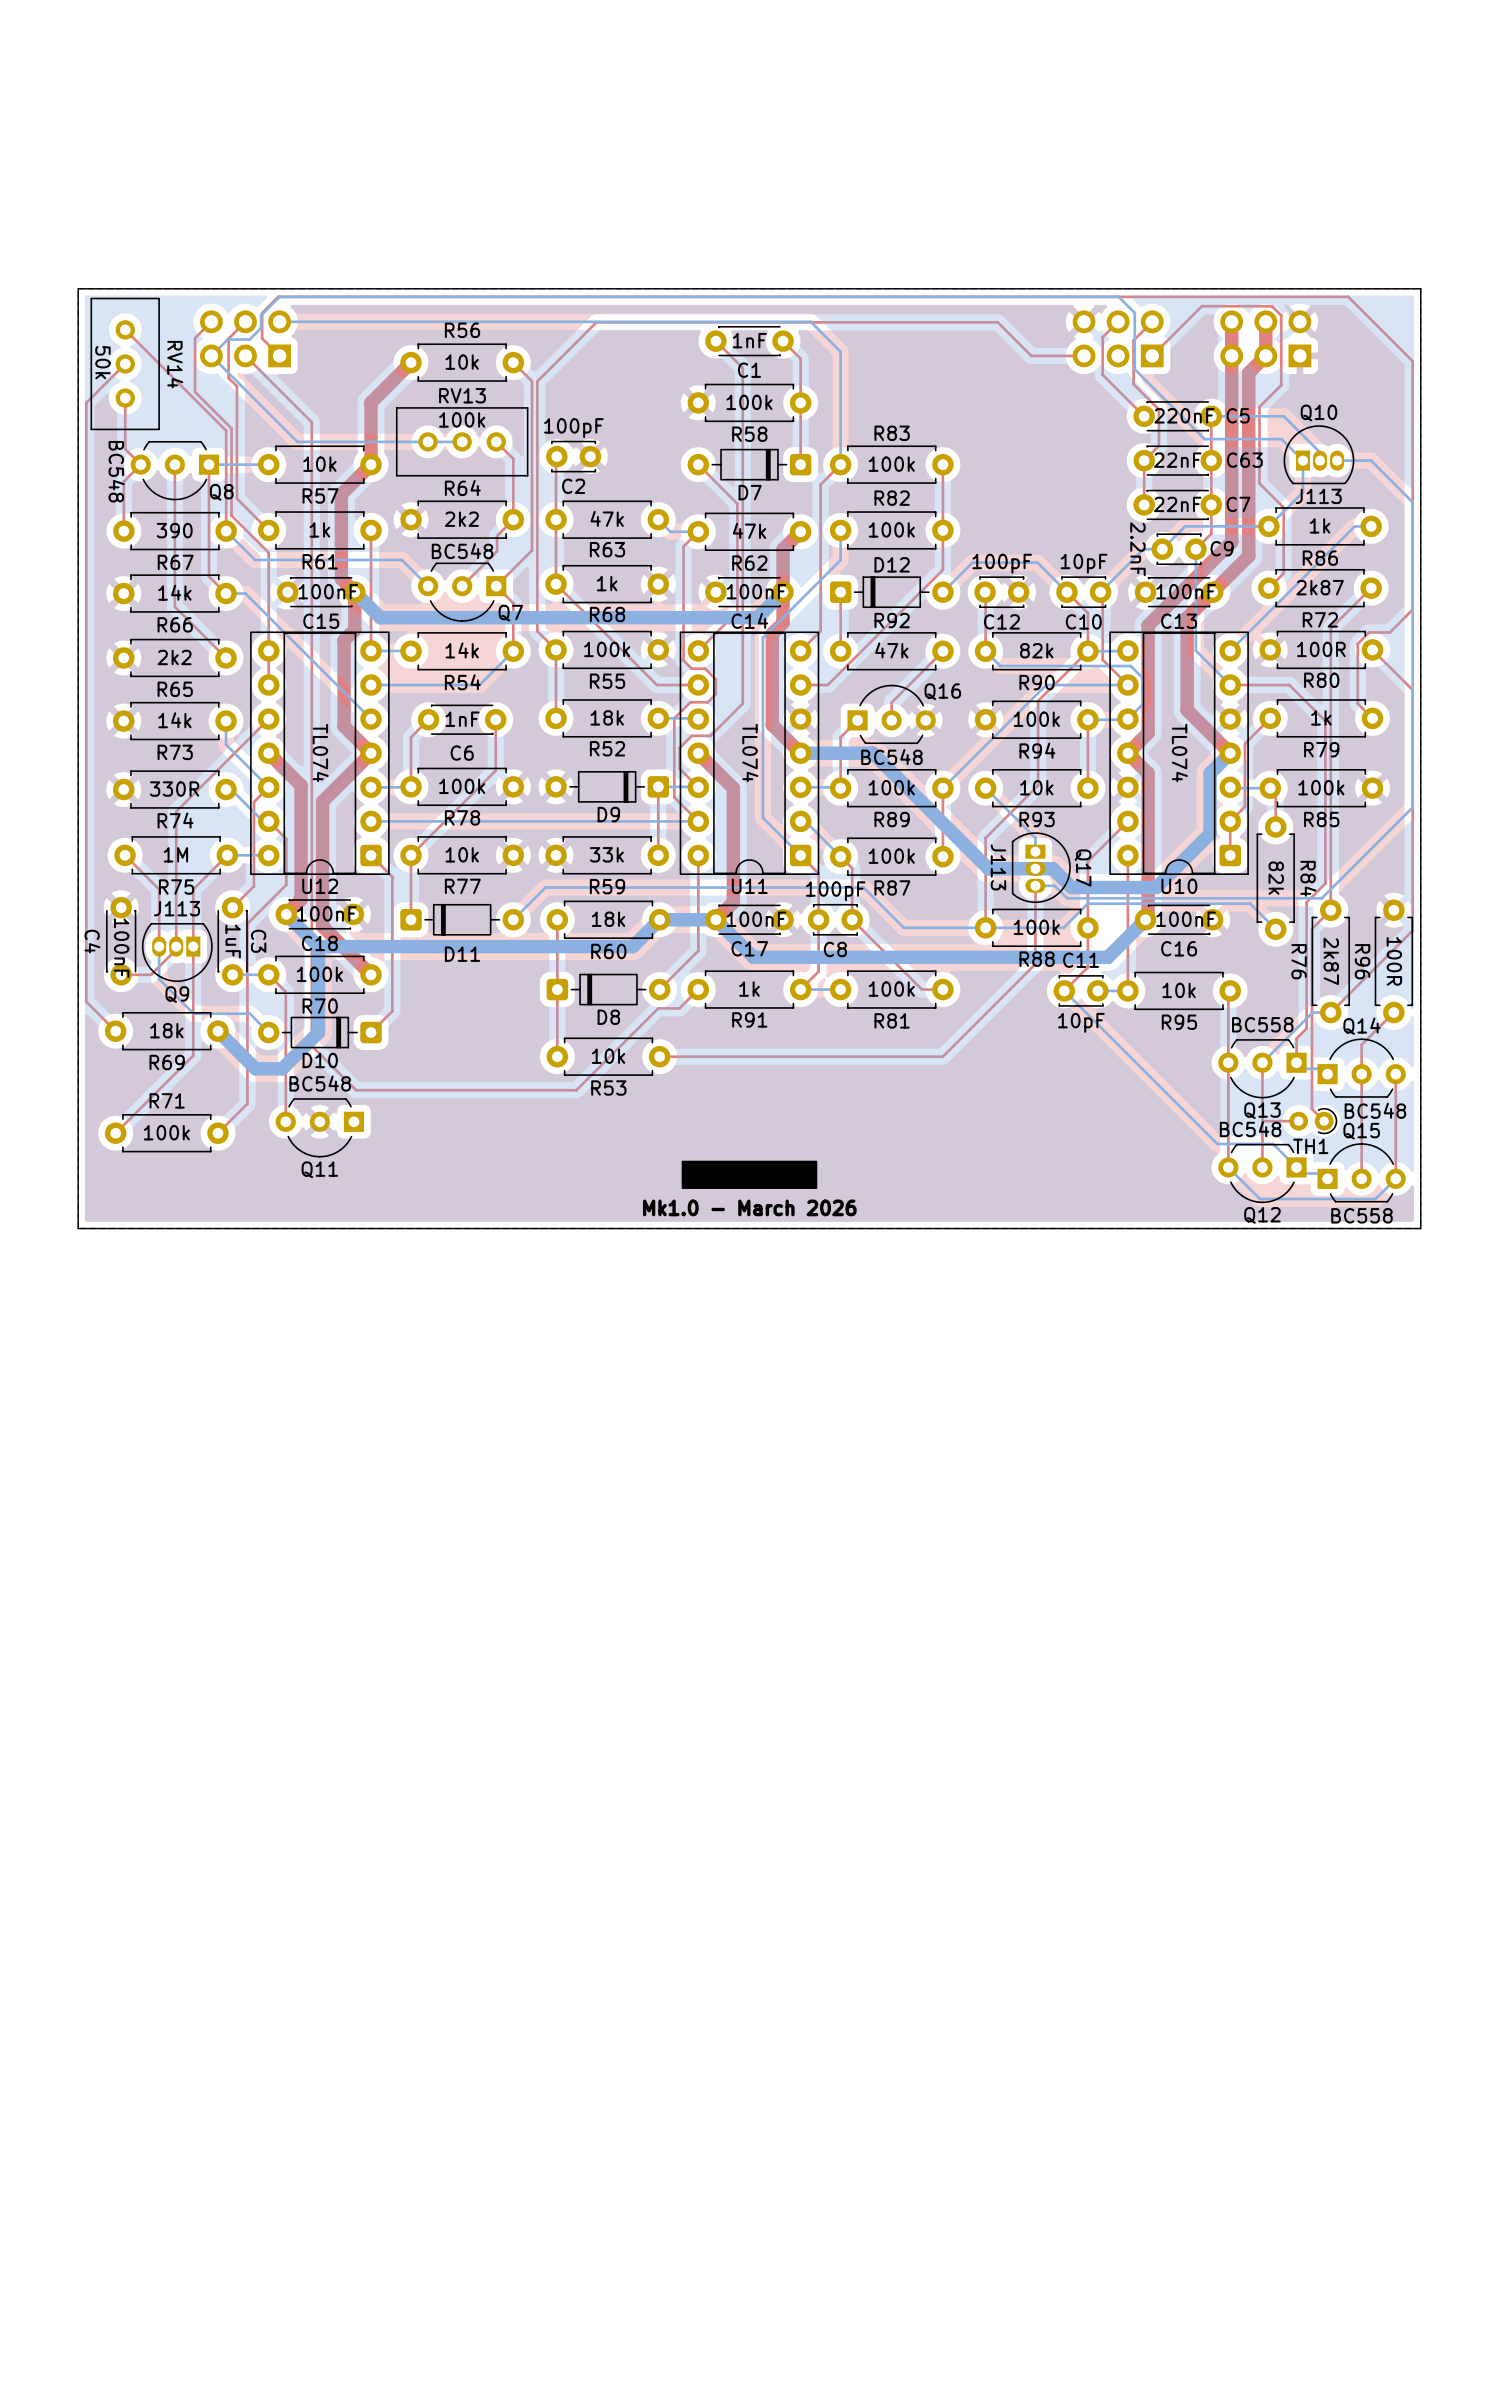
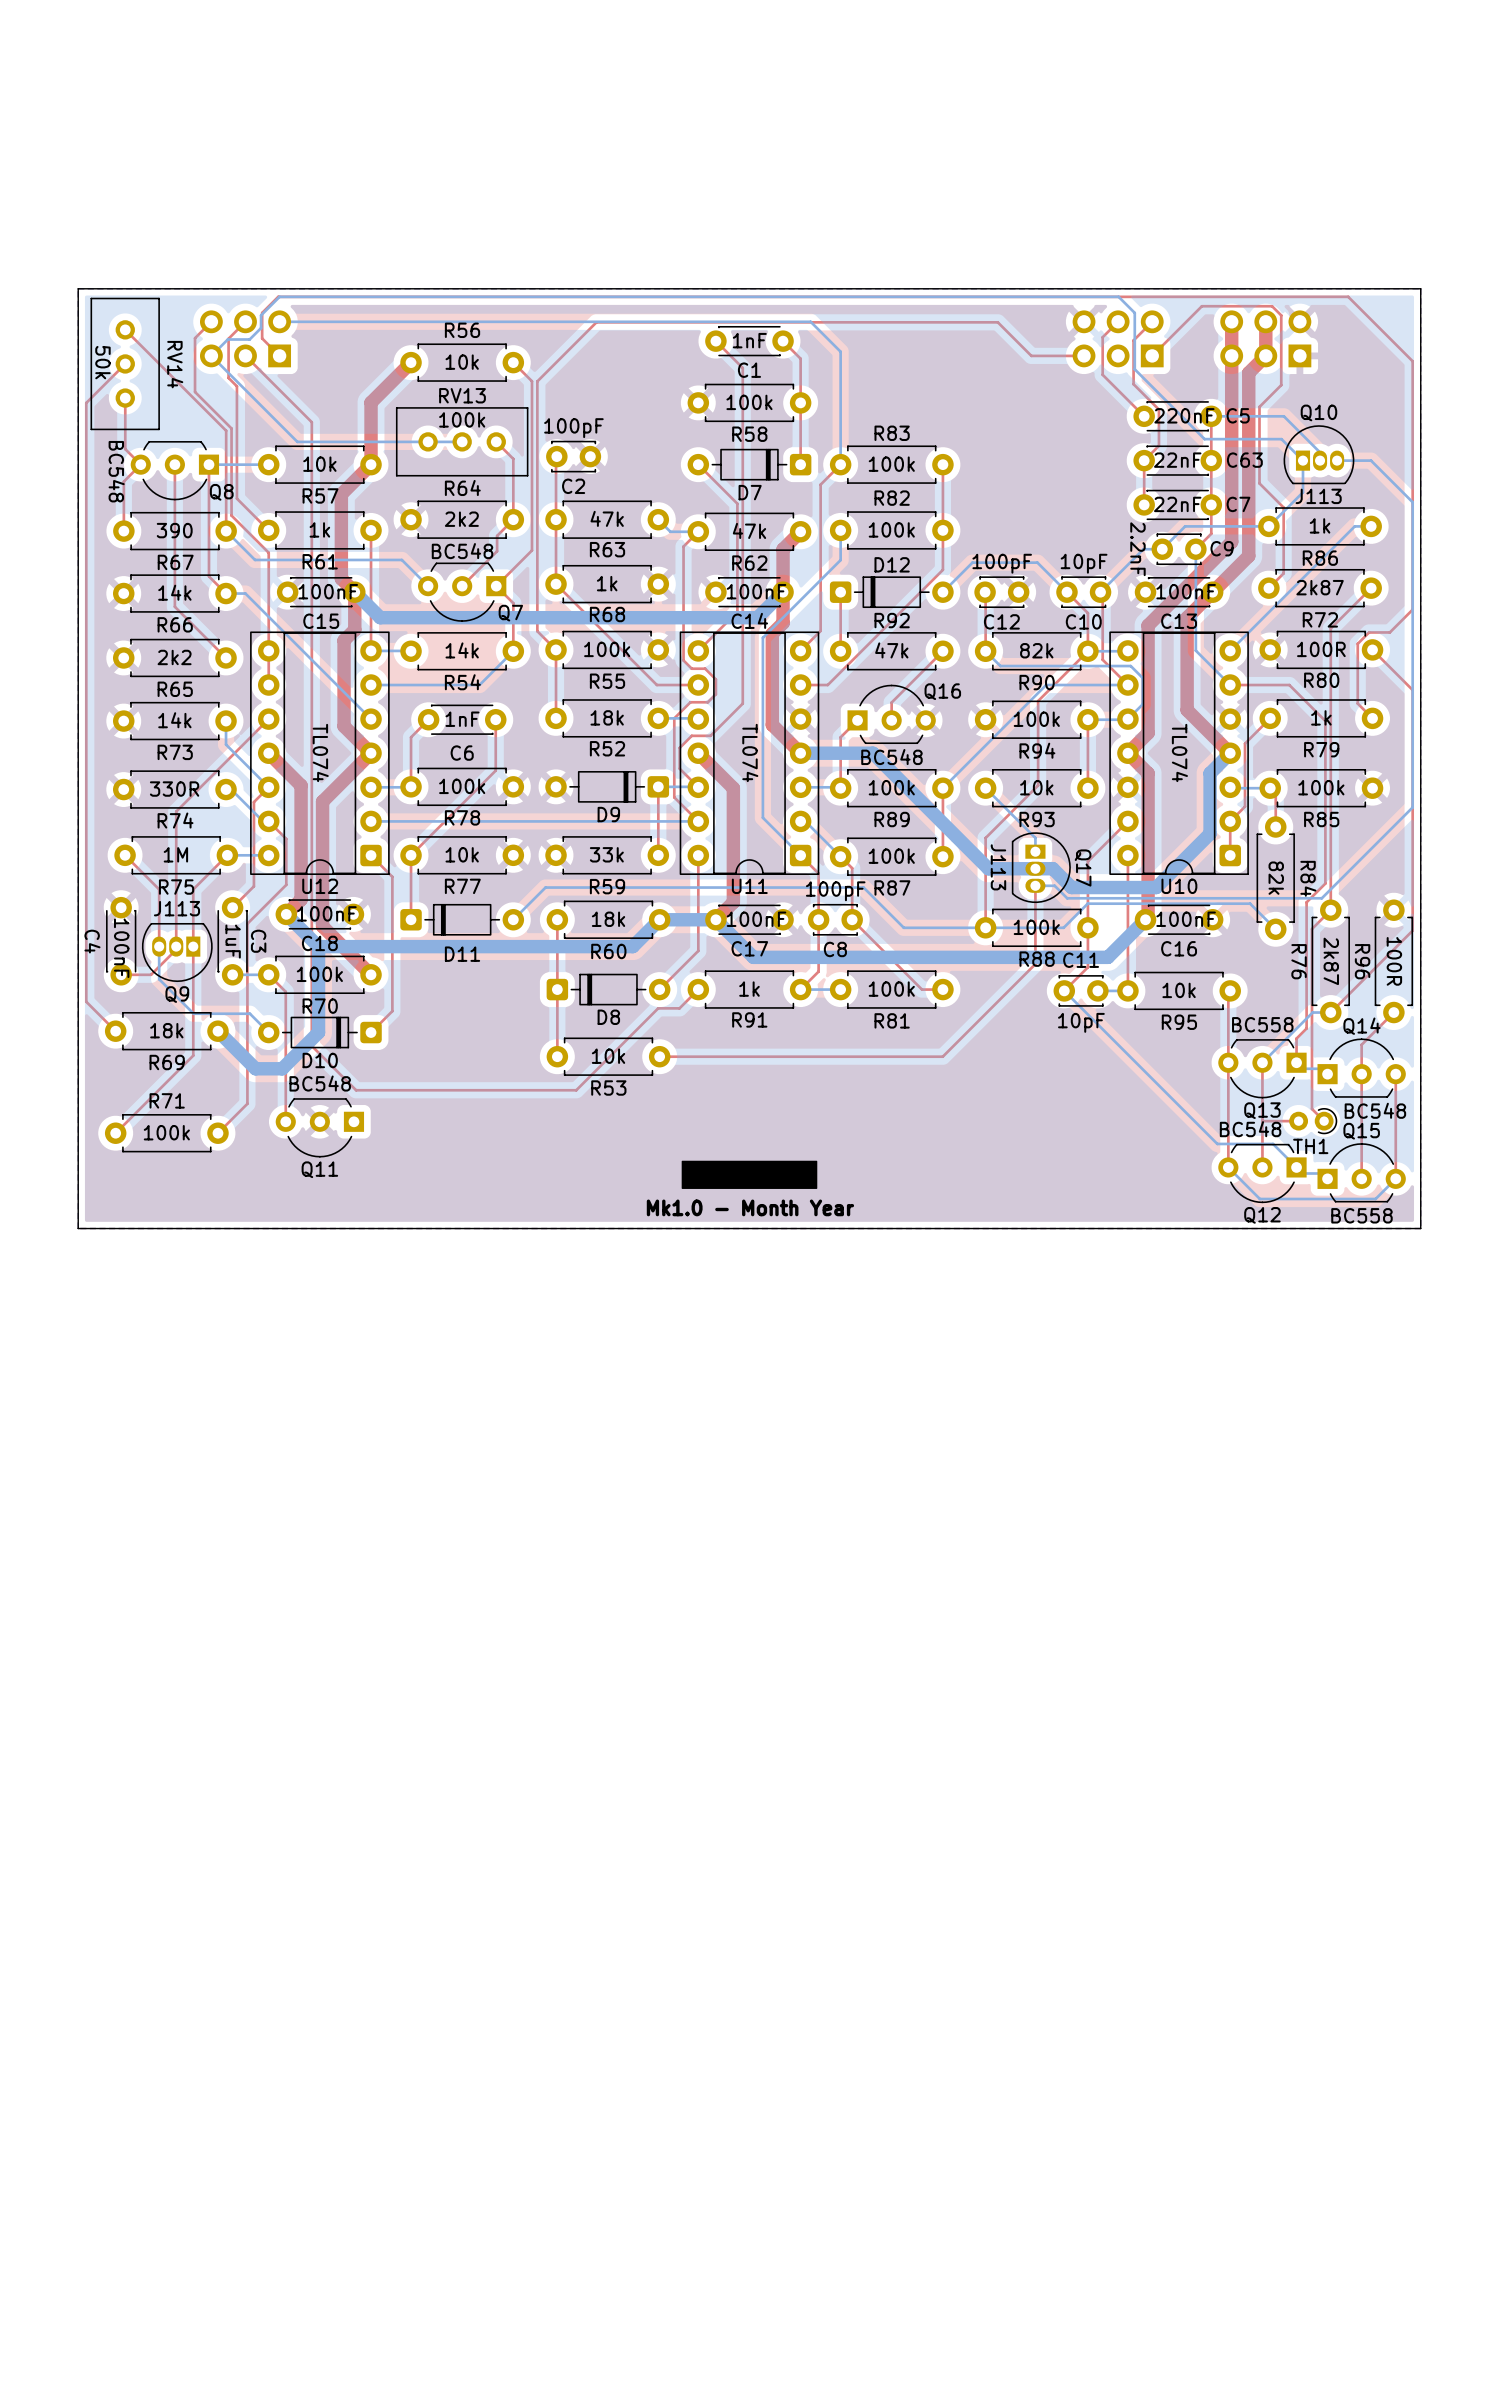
text: Mk1.0 - March 2026 (749, 1207) -> Mk1.0 - Month Year (750, 1207)

